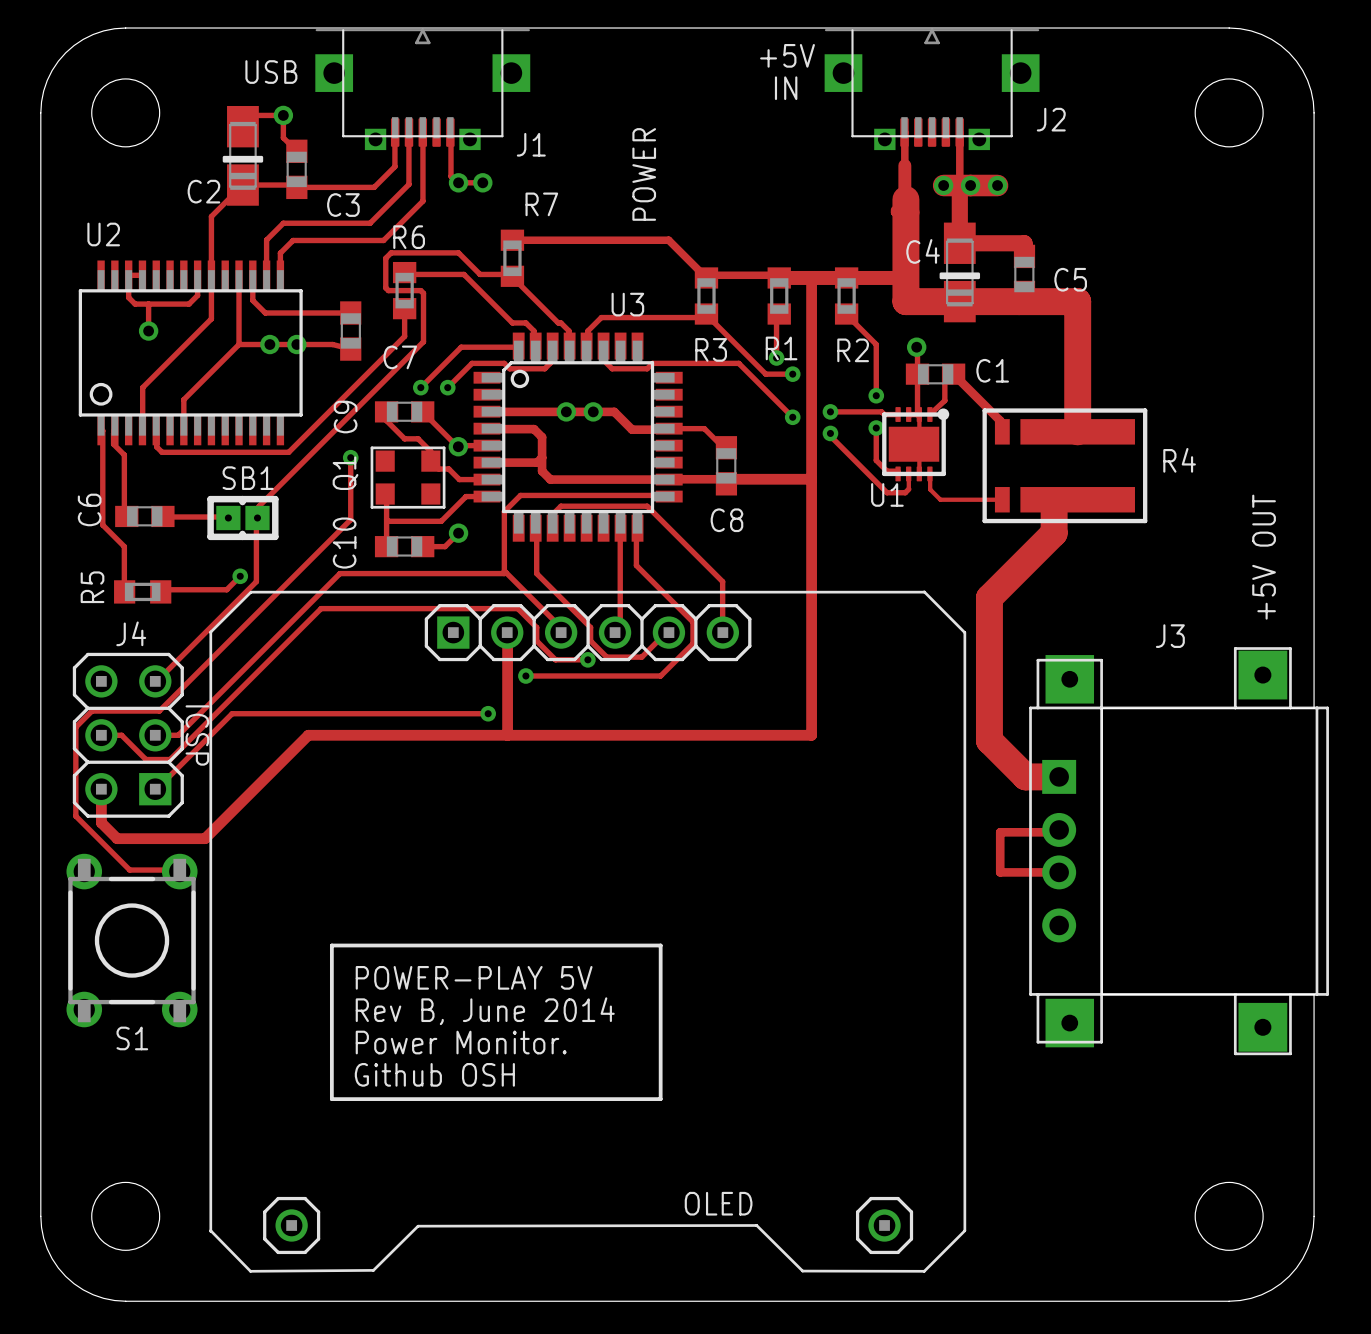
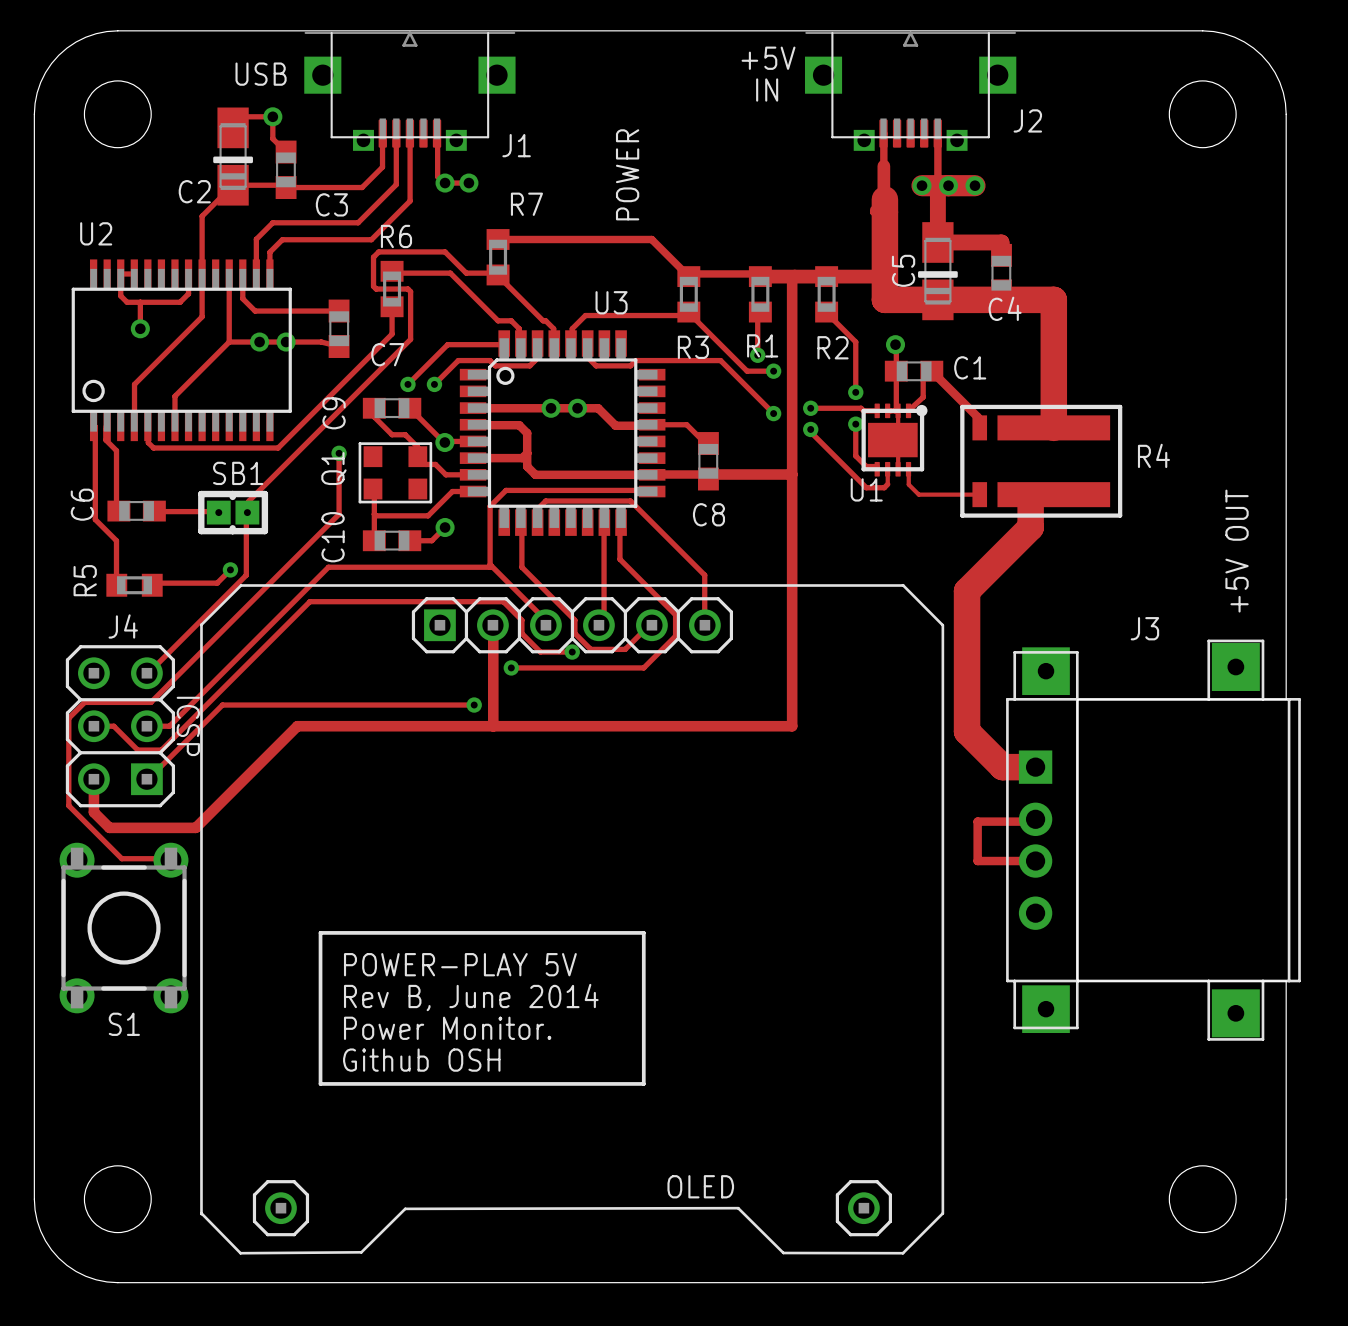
C4 name position: C4 (923, 251) -> C4 (1005, 308)
C5 name rotation: 0° (1070, 279) -> 90° counterclockwise (903, 270)
C5 name position: C5 (1070, 279) -> C5 (903, 270)

